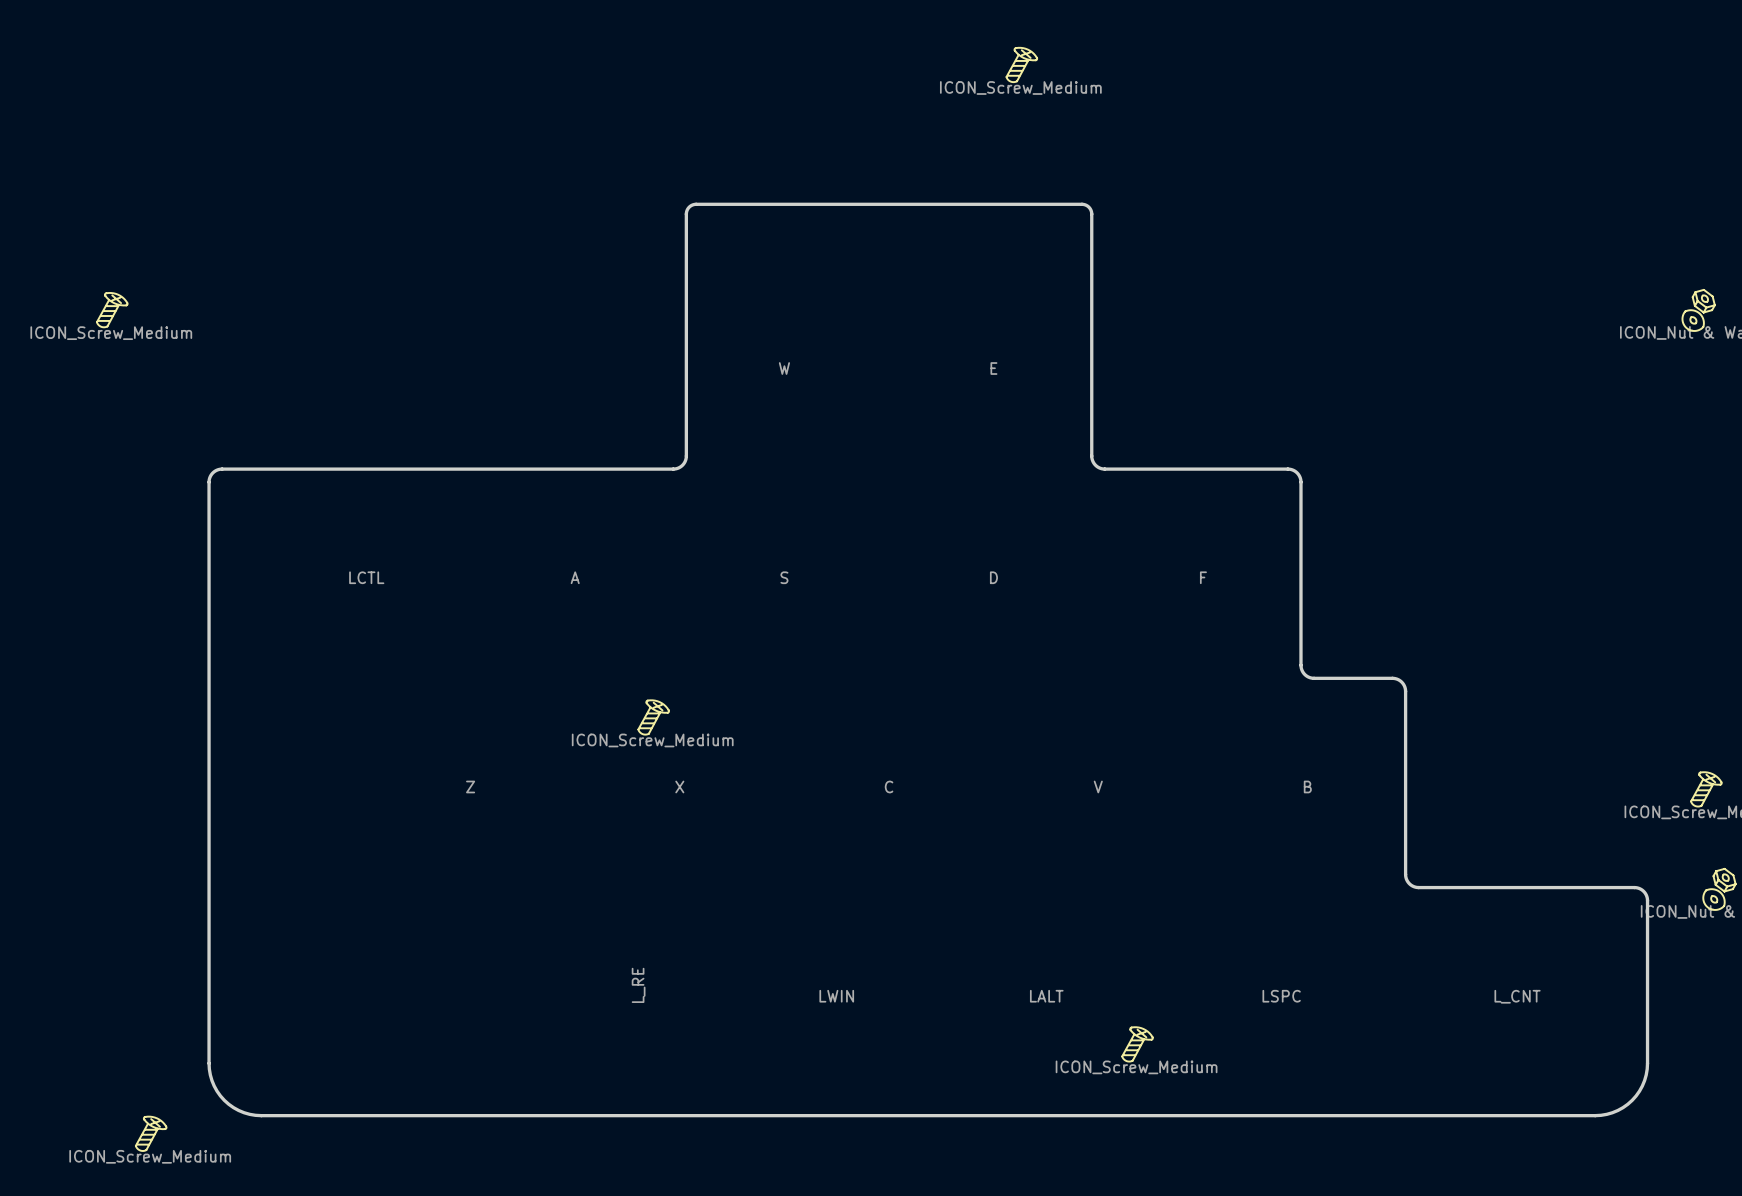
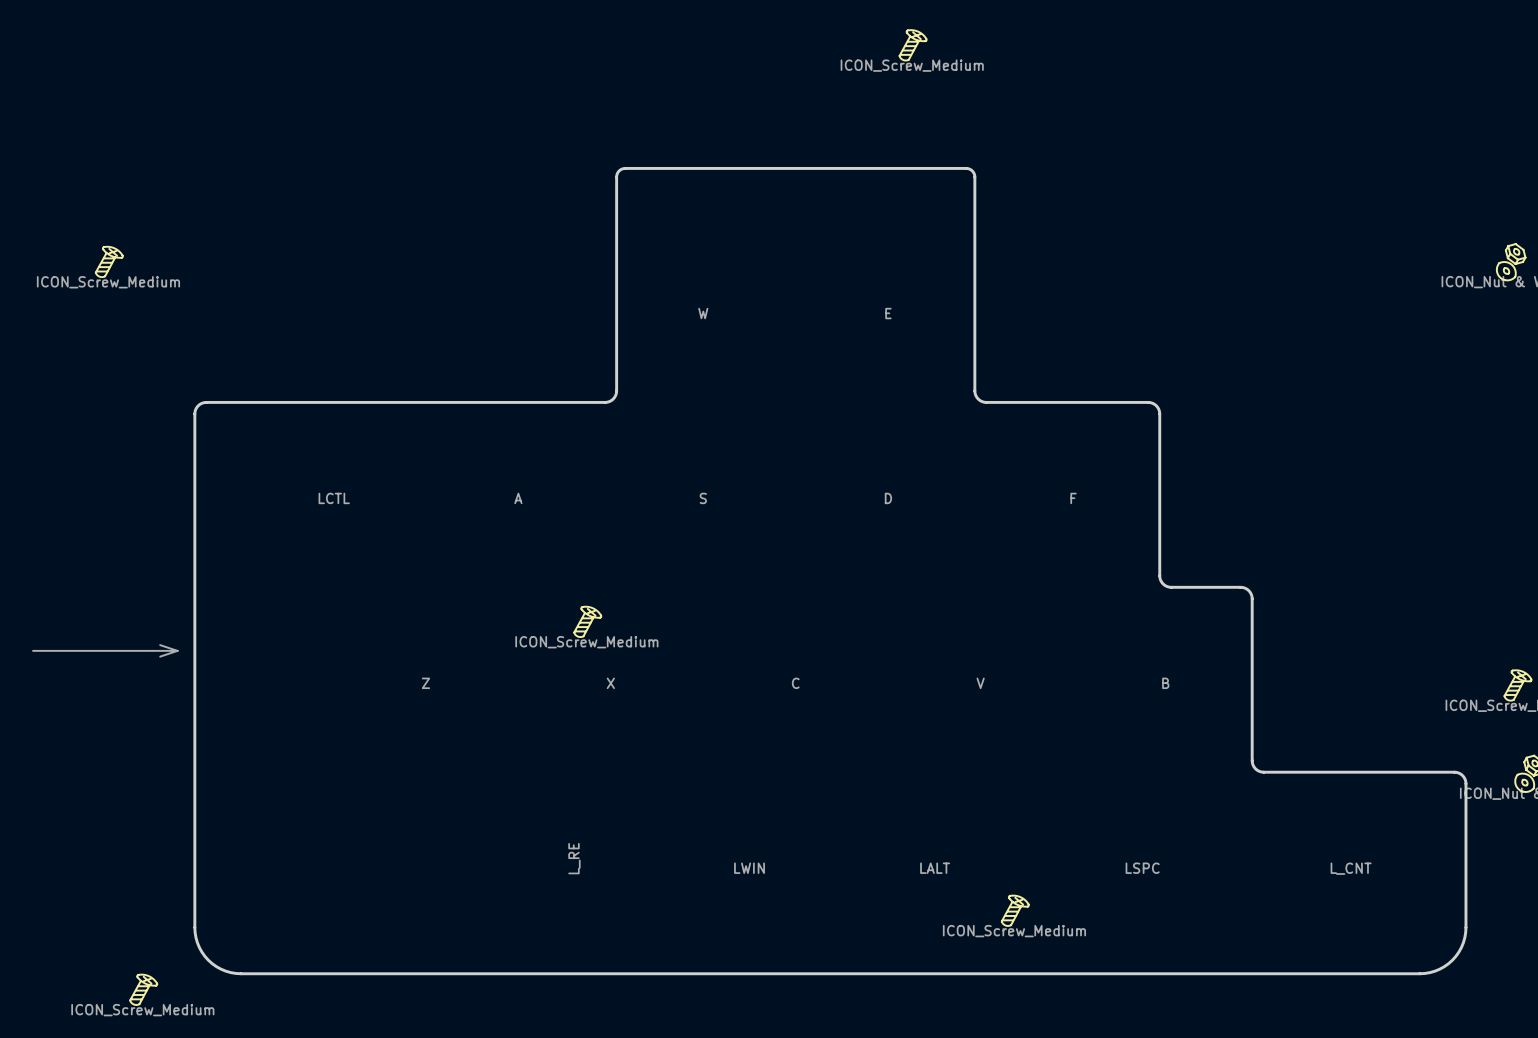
drawing: none -> [32, 166, 1468, 976]

